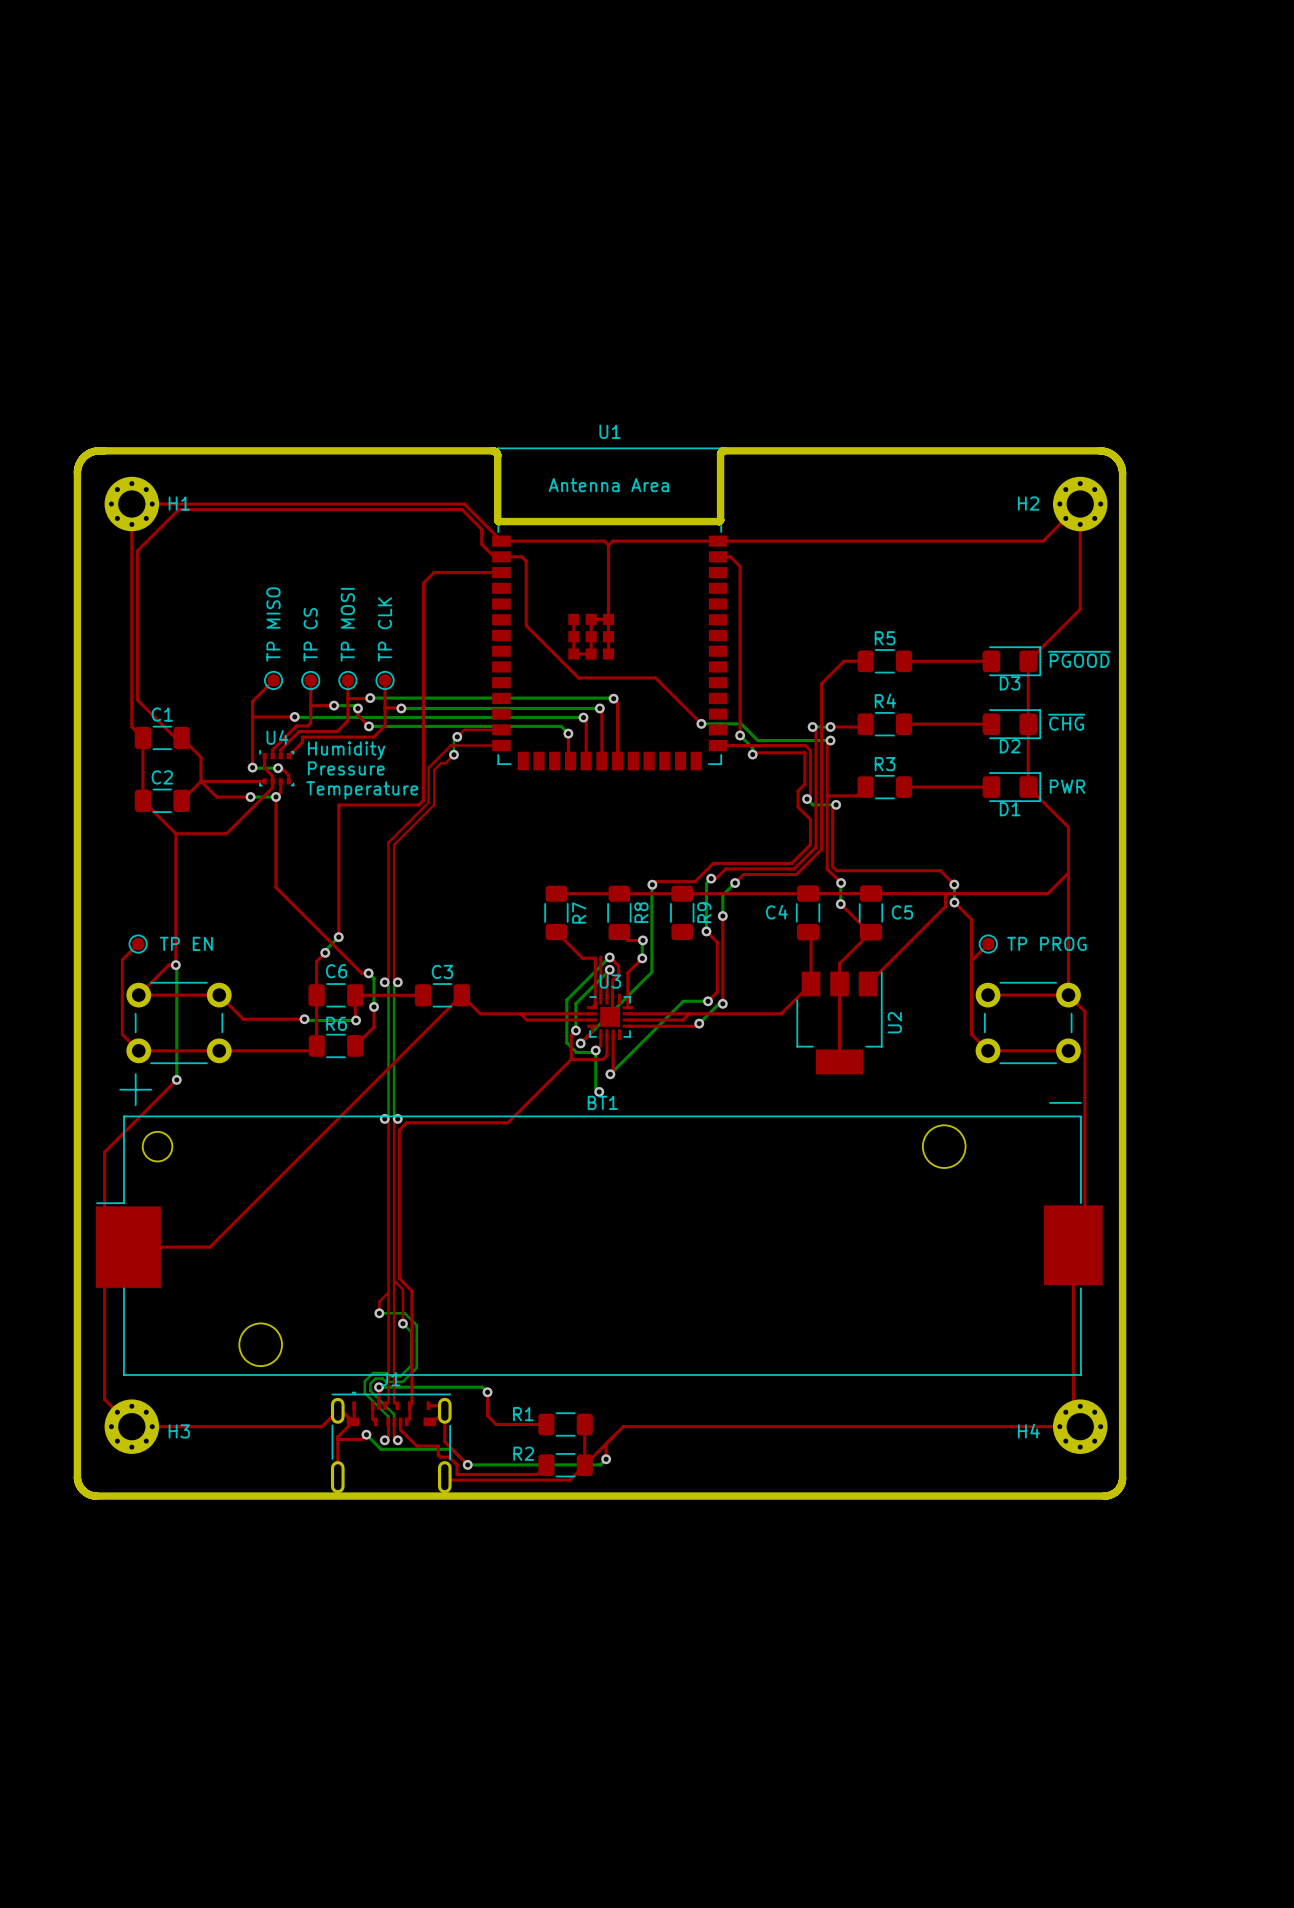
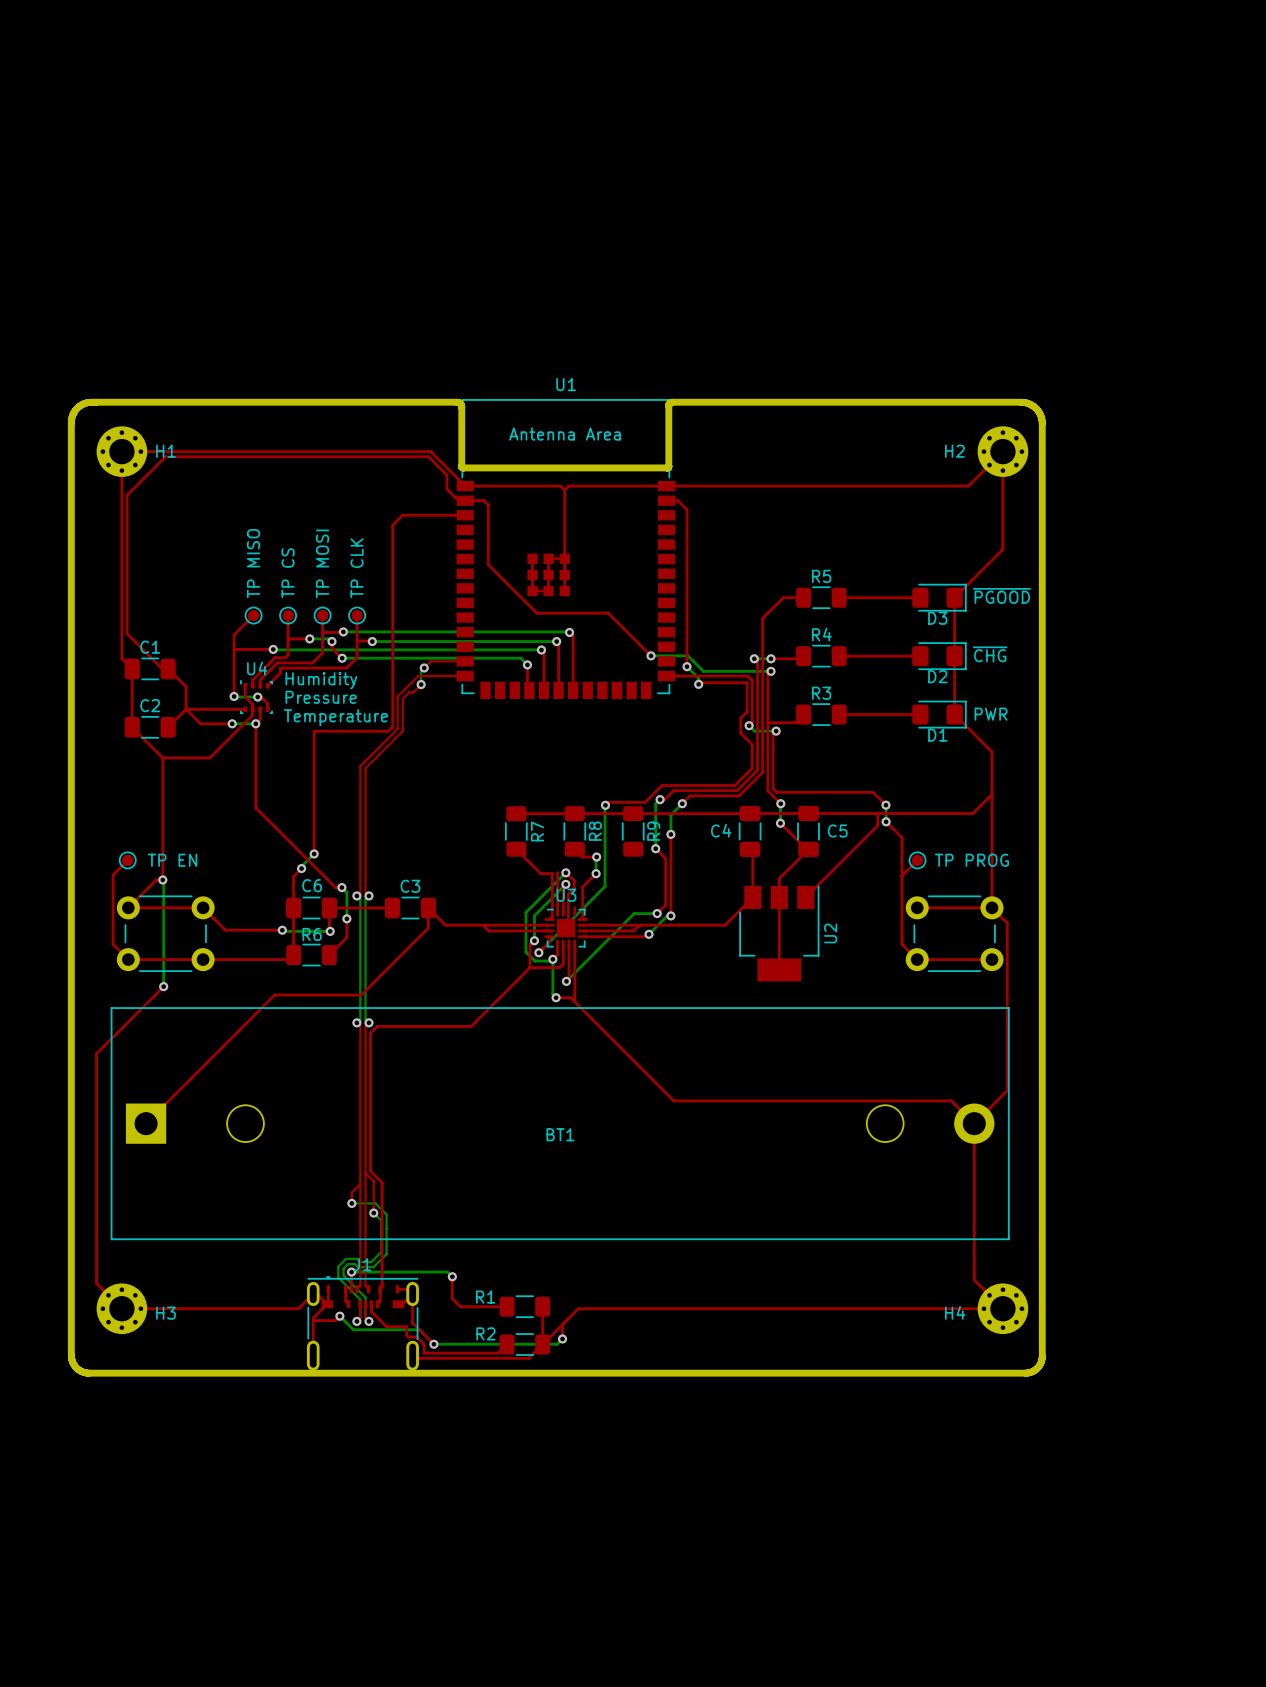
top track: (461, 995) (209, 1247) (128, 1247) -> (428, 908) (428, 927) (361, 995) (274, 995) (146, 1123)
top track: none -> (574, 944) (574, 1001)
BT1 footprint: [95, 1073, 1103, 1376] -> [110, 1007, 1010, 1240]
top track: none -> (556, 997) (570, 997) (673, 1100) (951, 1100) (974, 1123)
BT1 name position: BT1 (602, 1102) -> BT1 (560, 1134)
top track: (1084, 1191) (1084, 1233) (1073, 1245) (1073, 1419) -> (974, 1123) (974, 1280) (996, 1302)
top track: none -> (1007, 1090) (974, 1123)

